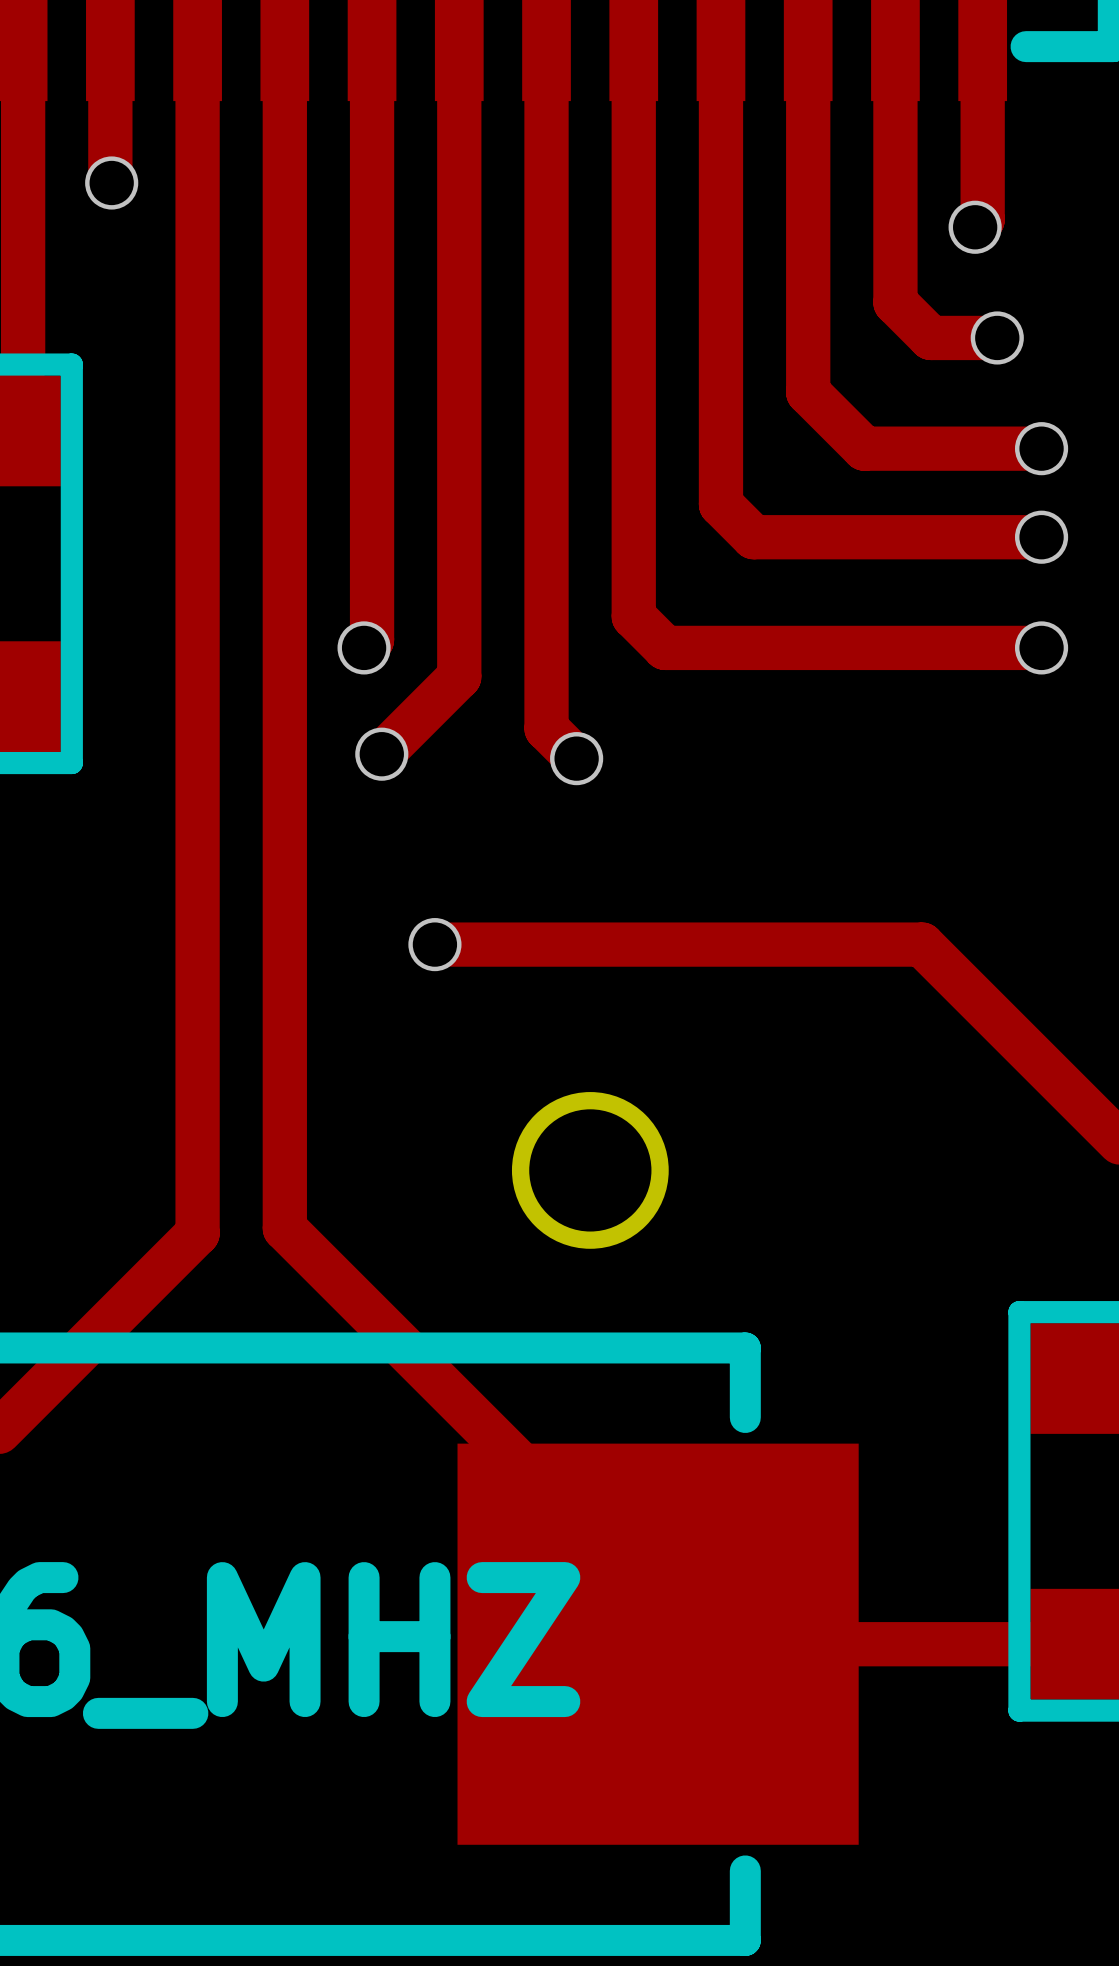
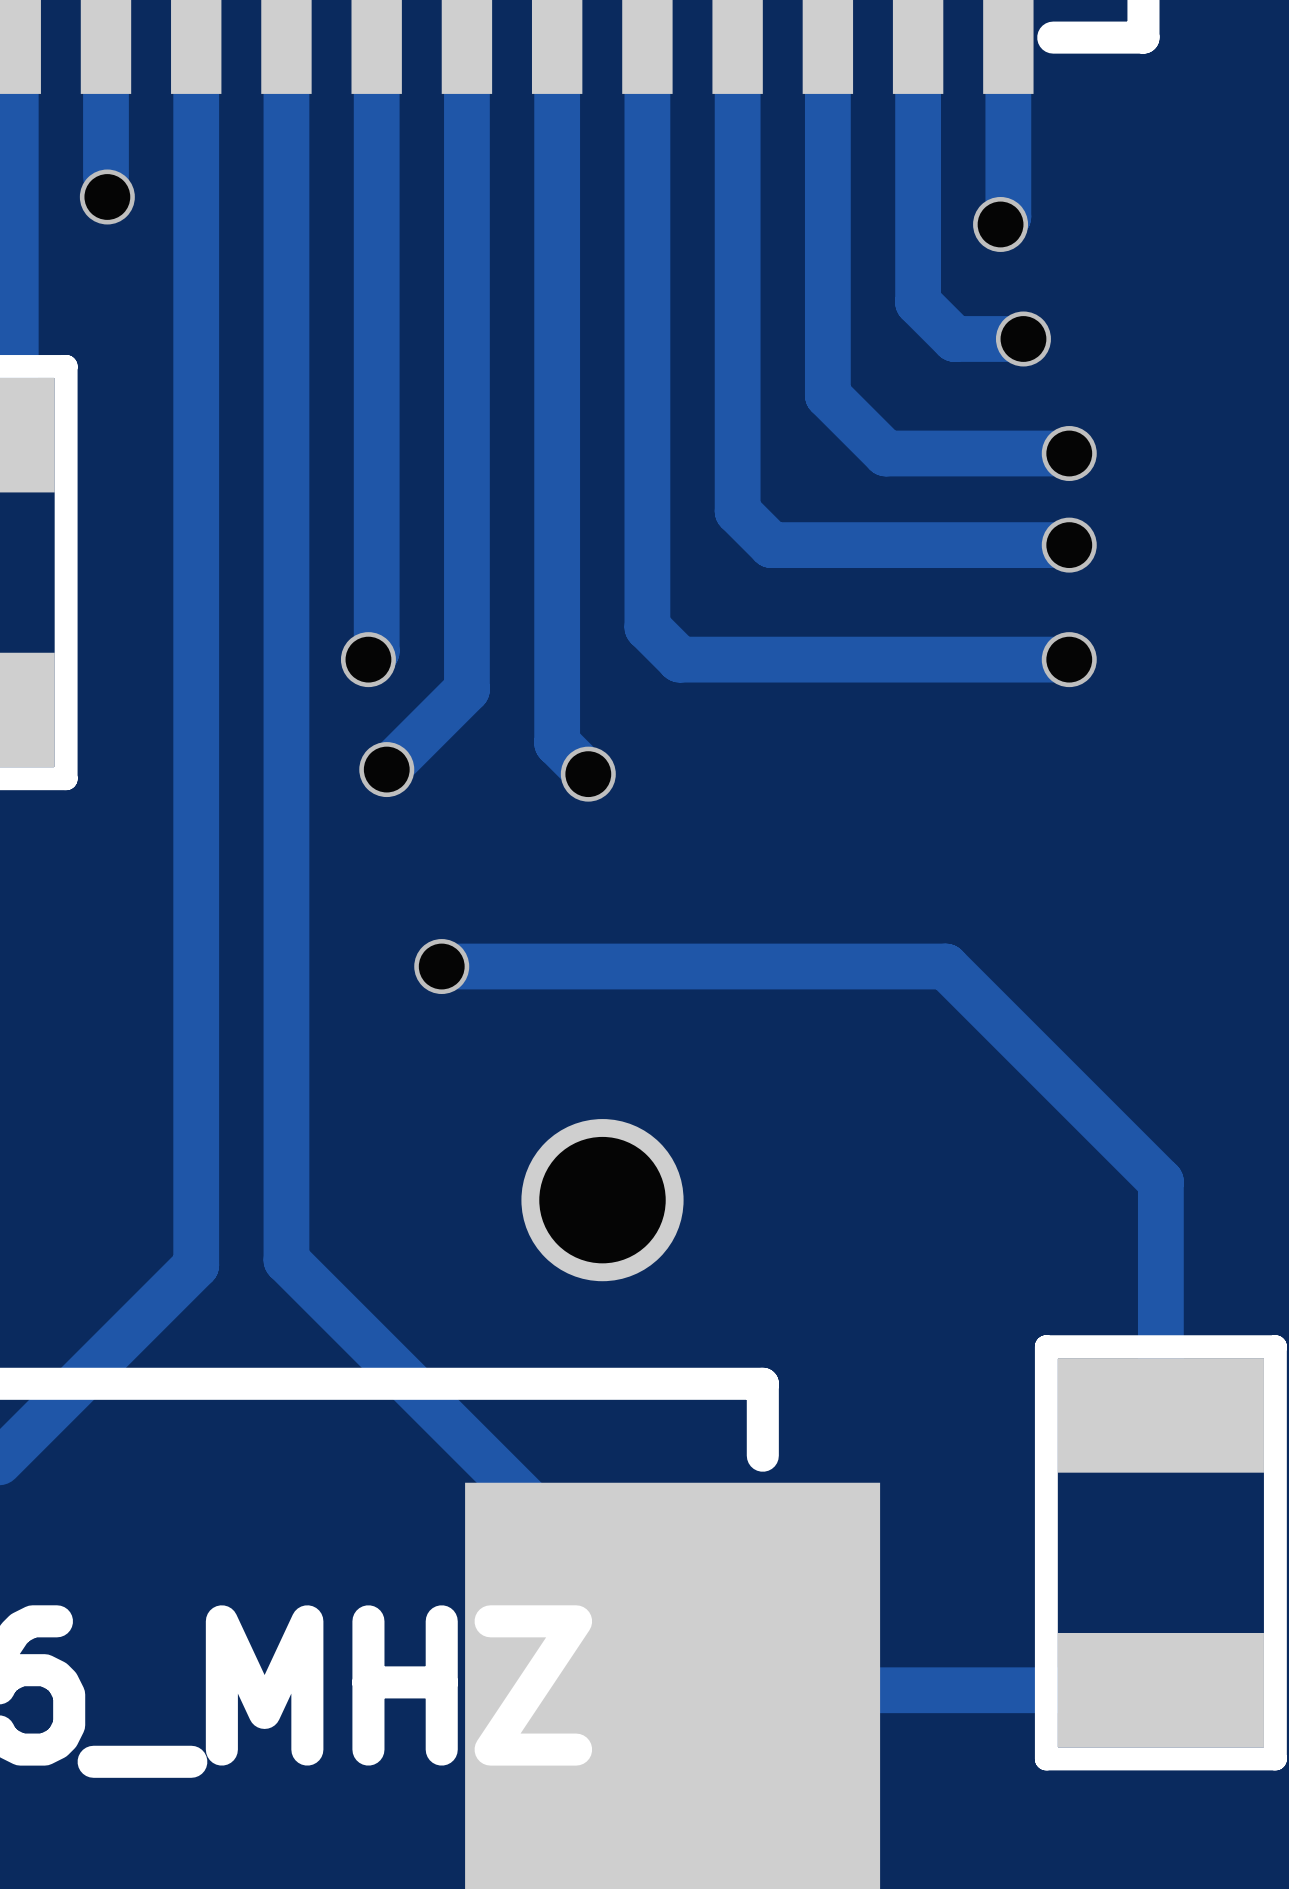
via position: (111, 182) -> (107, 196)

